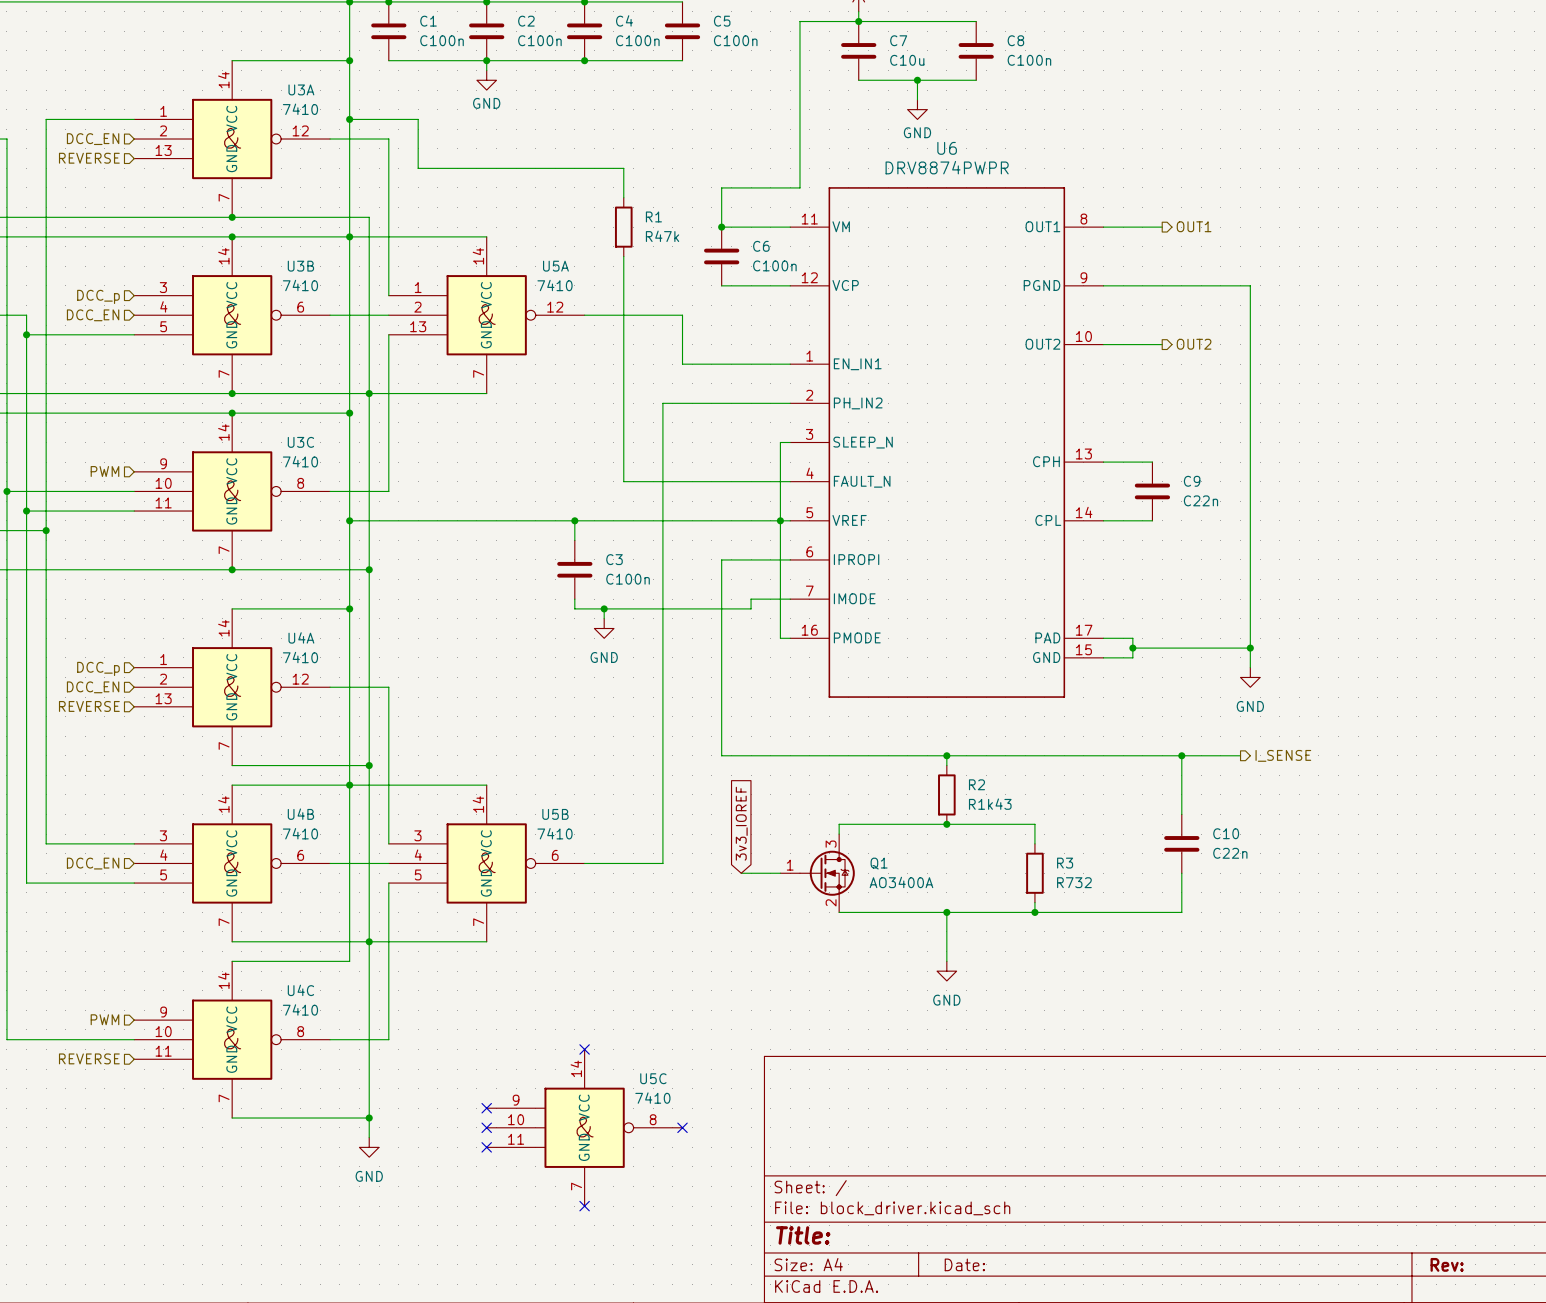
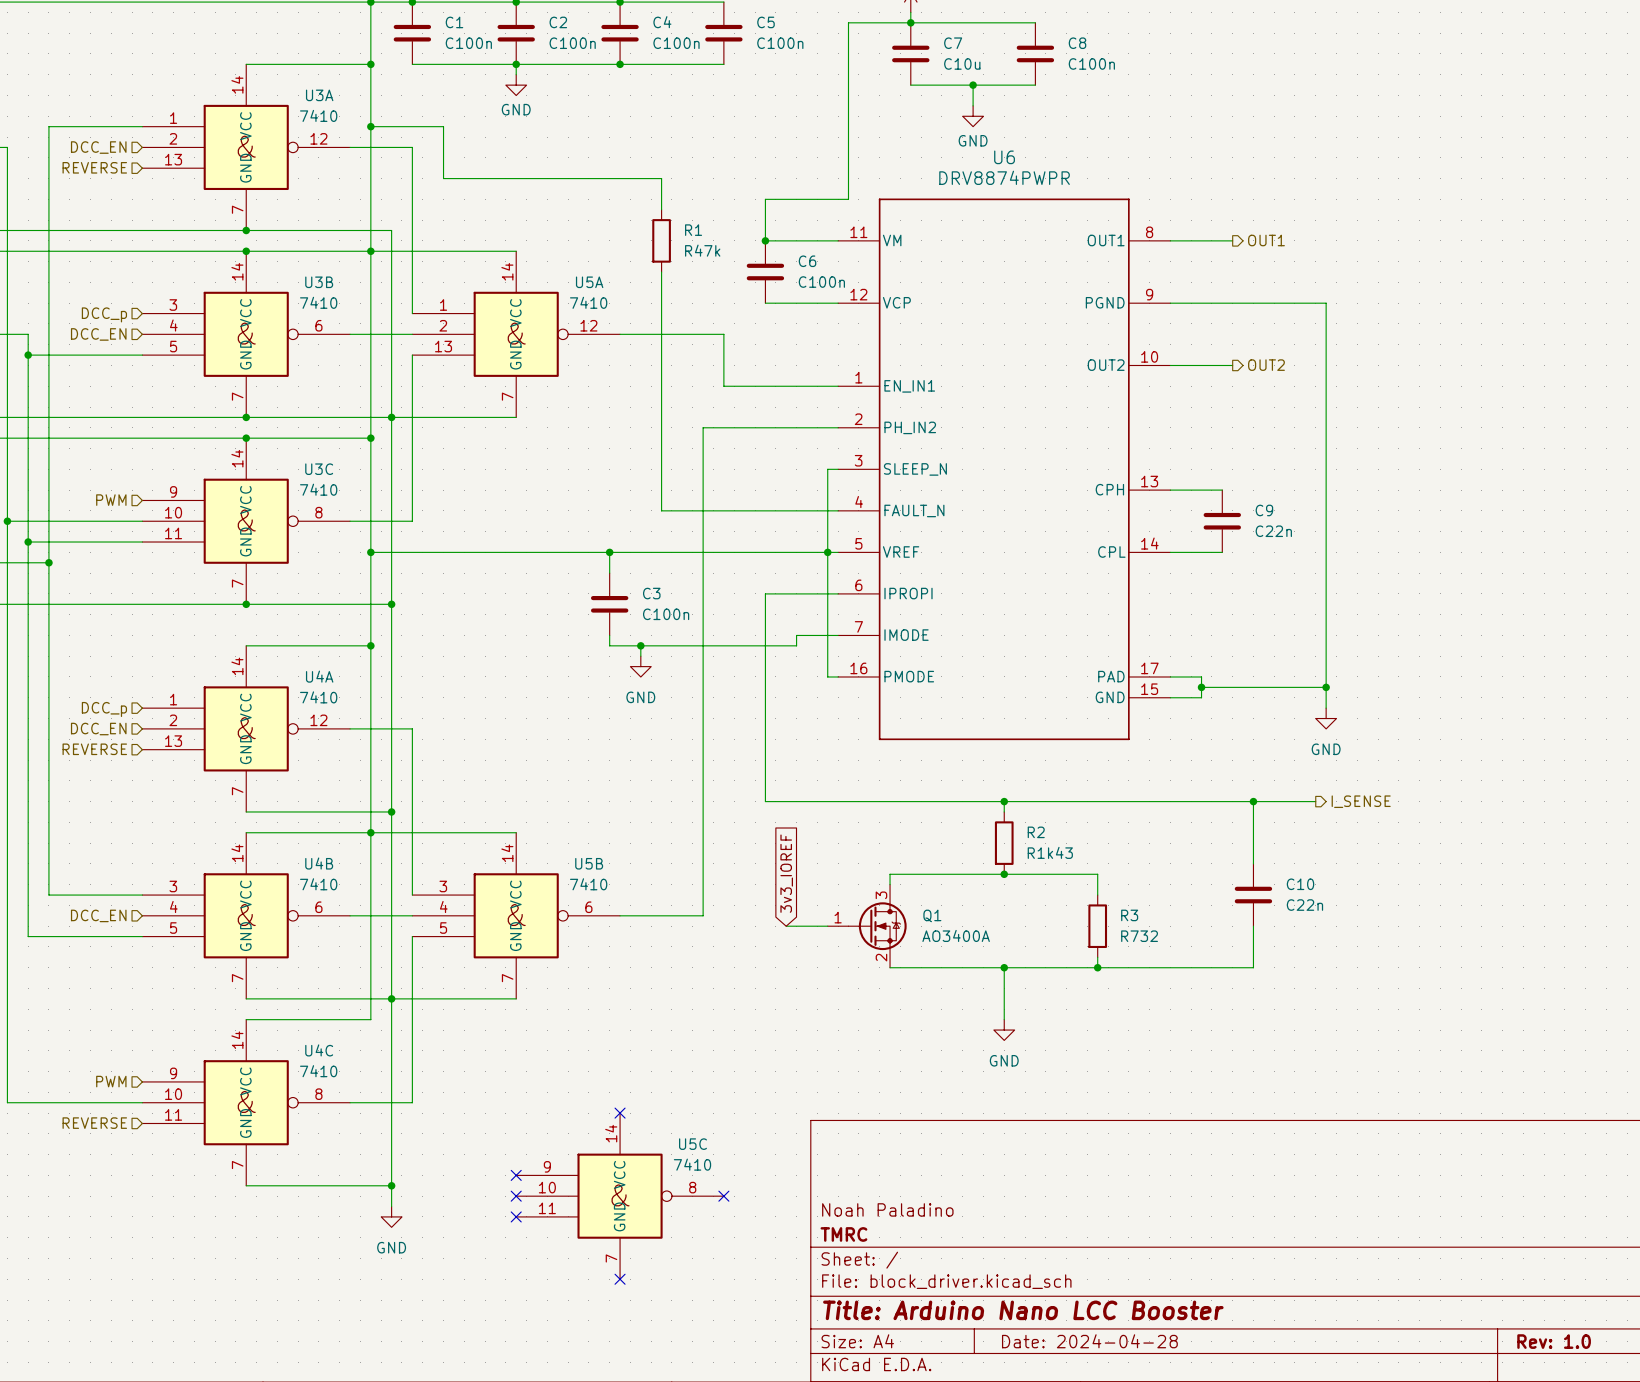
title block: none -> Noah Paladino (887, 1209)
title block: none -> TMRC (843, 1234)
title block: Title: (803, 1235) -> Title: Arduino Nano LCC Booster (1023, 1310)
title block: Date: (964, 1264) -> Date: 2024-04-28 (1089, 1341)
title block: Rev: (1447, 1264) -> Rev: 1.0 (1554, 1341)

